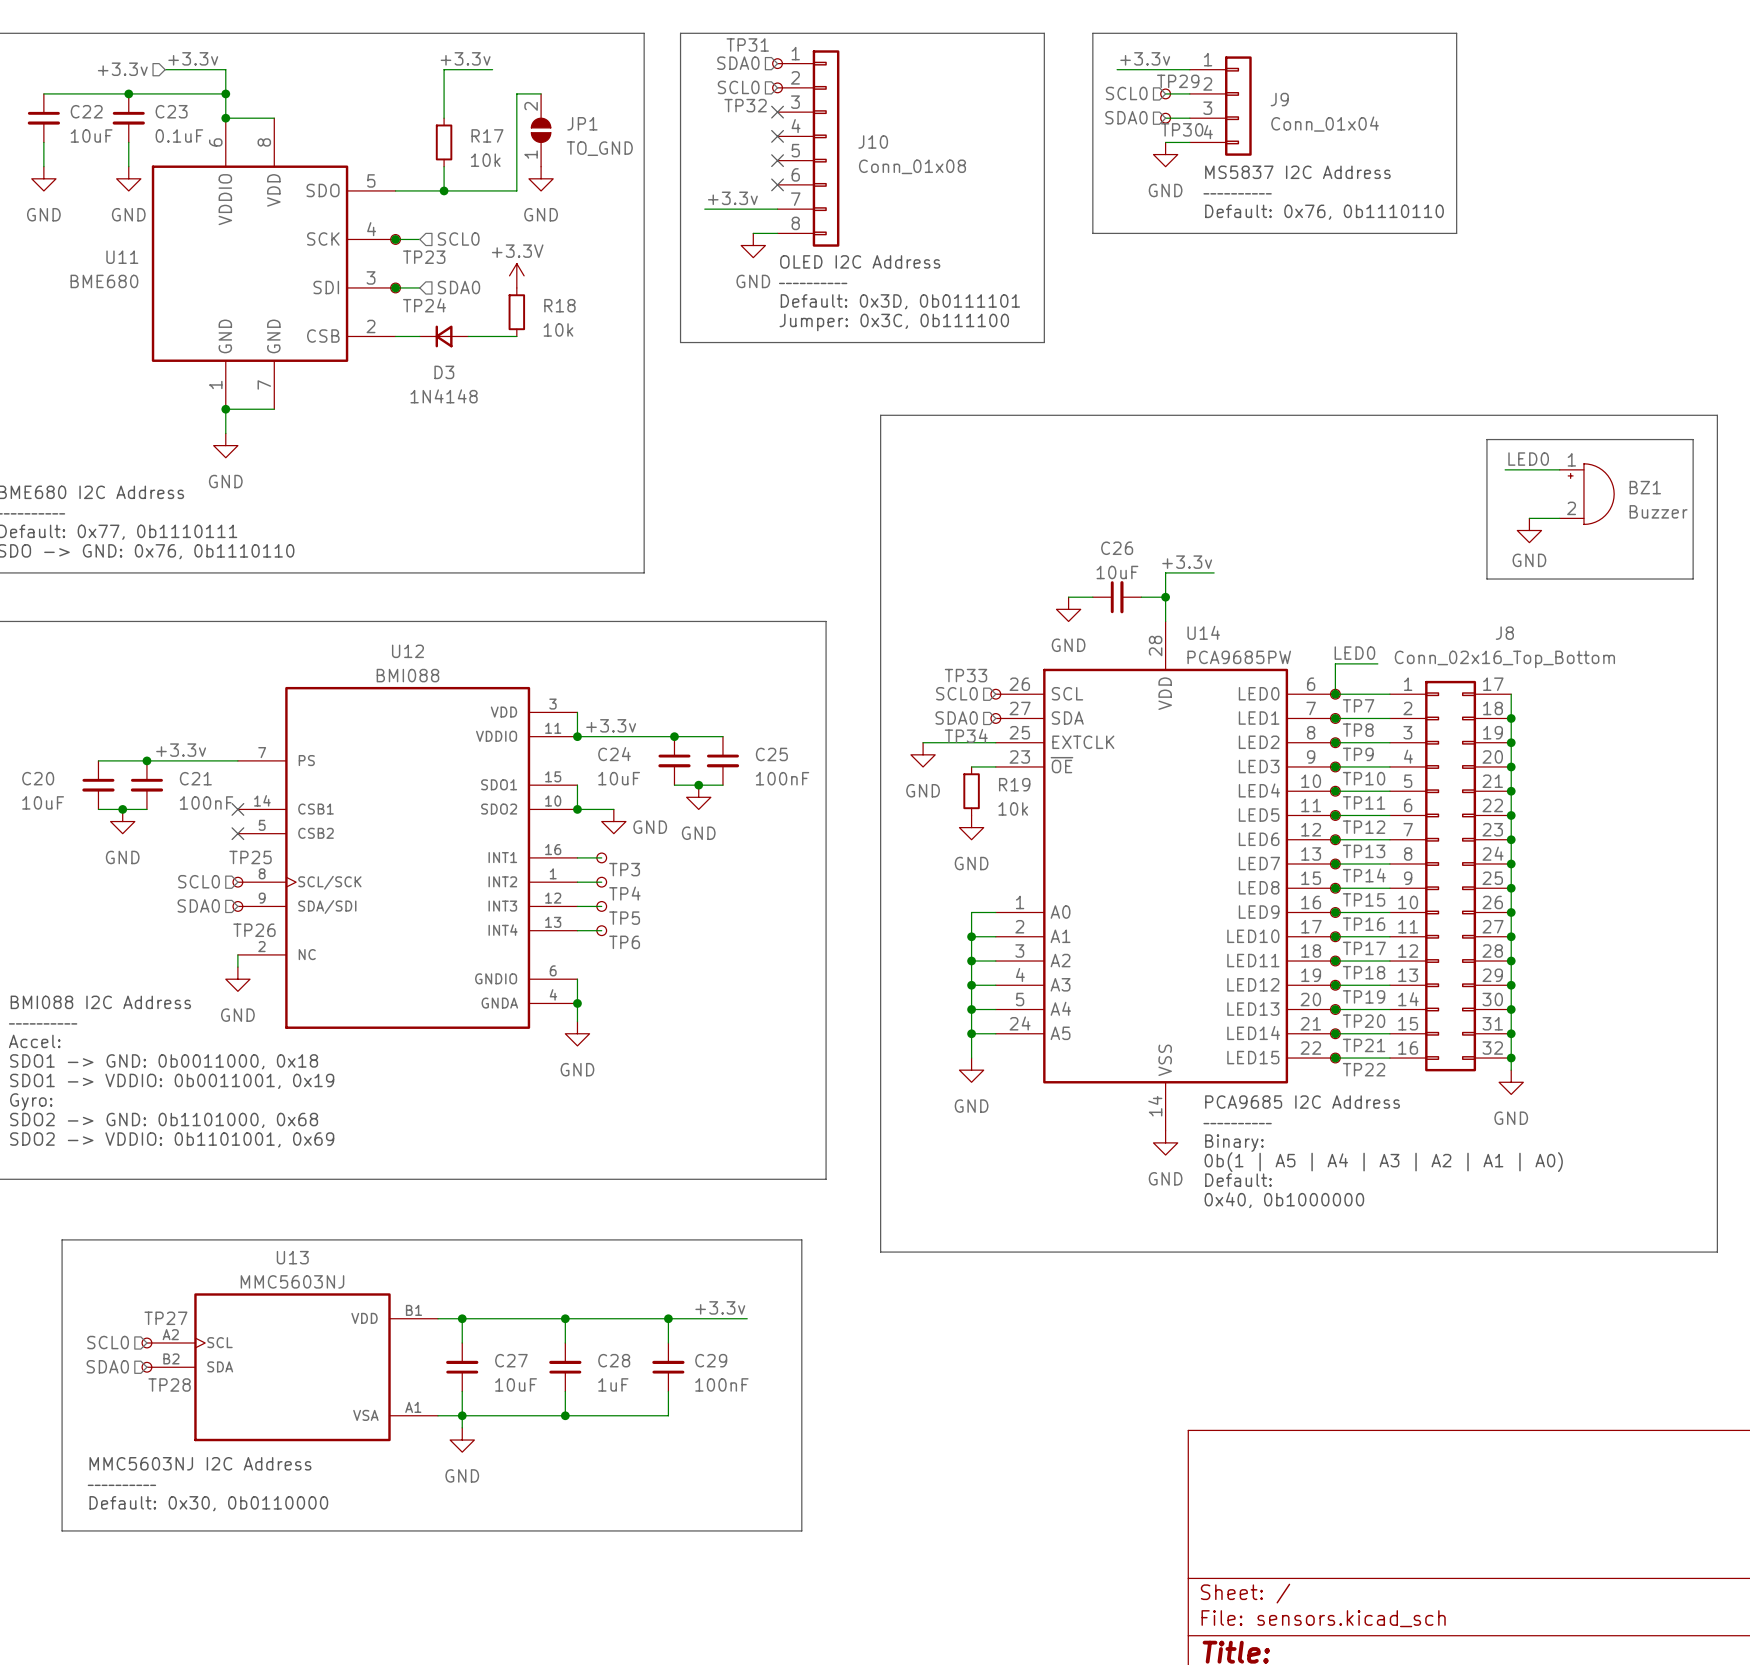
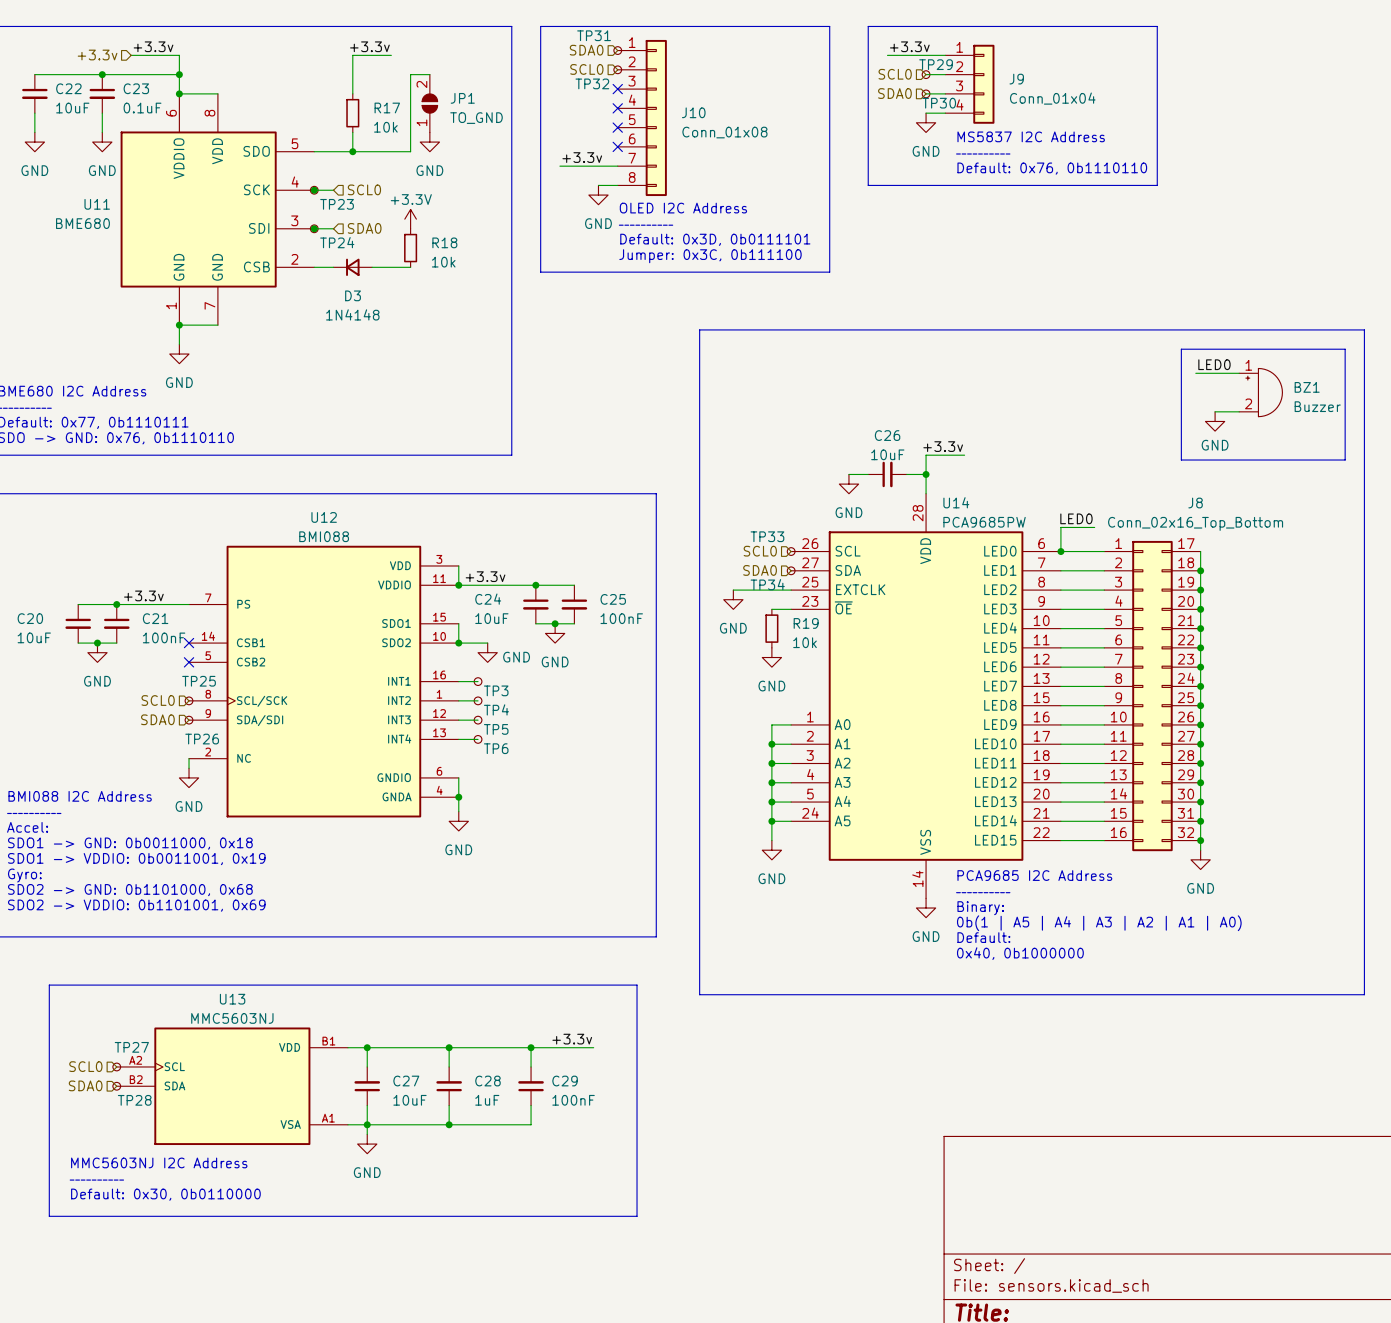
TP7: (1335, 694) -> none
junction: (1335, 718) -> none
TP8: (1335, 718) -> none
junction: (1335, 742) -> none
TP9: (1335, 742) -> none
junction: (1335, 766) -> none
TP10: (1335, 766) -> none
junction: (1335, 791) -> none
TP11: (1335, 791) -> none
junction: (1335, 815) -> none
TP12: (1335, 815) -> none
junction: (1335, 839) -> none
TP13: (1335, 839) -> none
junction: (1335, 863) -> none
TP14: (1335, 863) -> none
junction: (1335, 888) -> none
TP15: (1335, 888) -> none
junction: (1335, 912) -> none
TP16: (1335, 912) -> none
junction: (1335, 936) -> none
TP17: (1335, 936) -> none
junction: (1335, 961) -> none
TP18: (1335, 961) -> none
junction: (1335, 985) -> none
TP19: (1335, 985) -> none
junction: (1335, 1009) -> none
TP20: (1335, 1009) -> none
junction: (1335, 1033) -> none
TP21: (1335, 1033) -> none
junction: (1335, 1058) -> none
TP22: (1335, 1058) -> none

